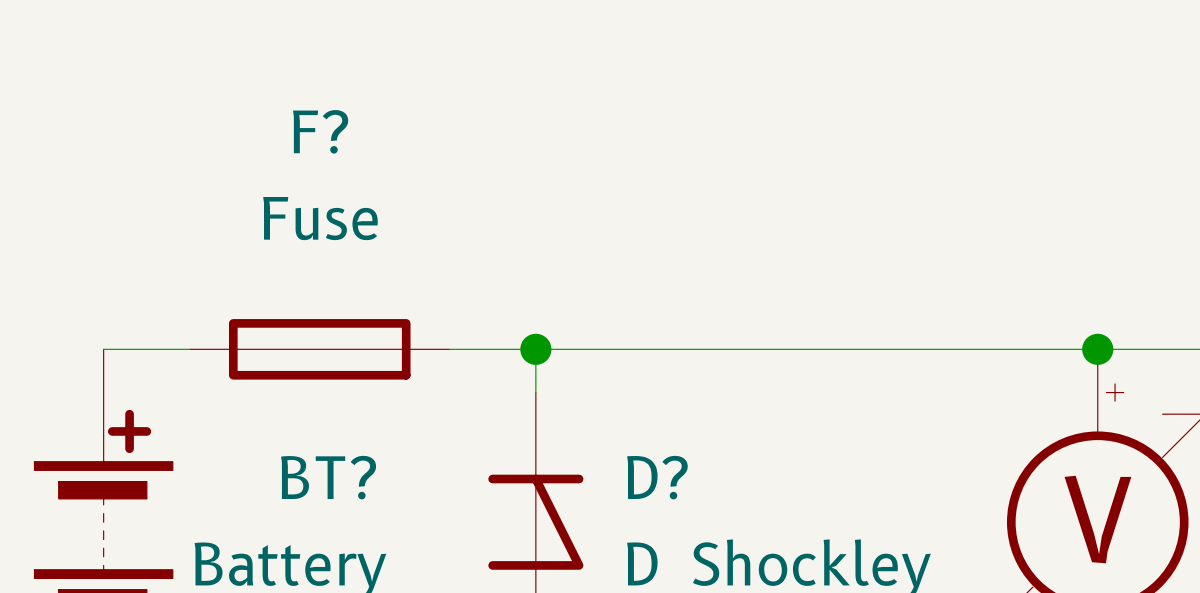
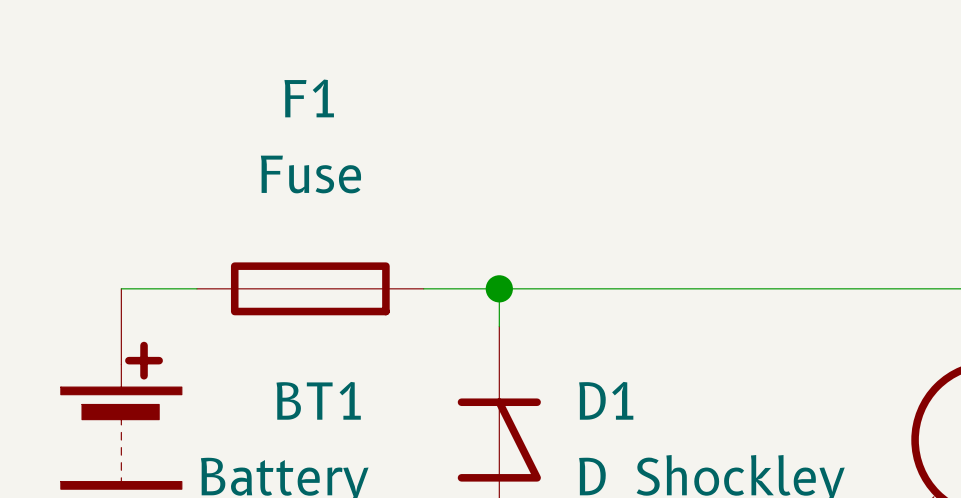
F? name: F? (320, 131) -> F1 (309, 98)
BT? name: BT? (328, 477) -> BT1 (318, 400)
D? name: D? (657, 477) -> D1 (606, 400)

